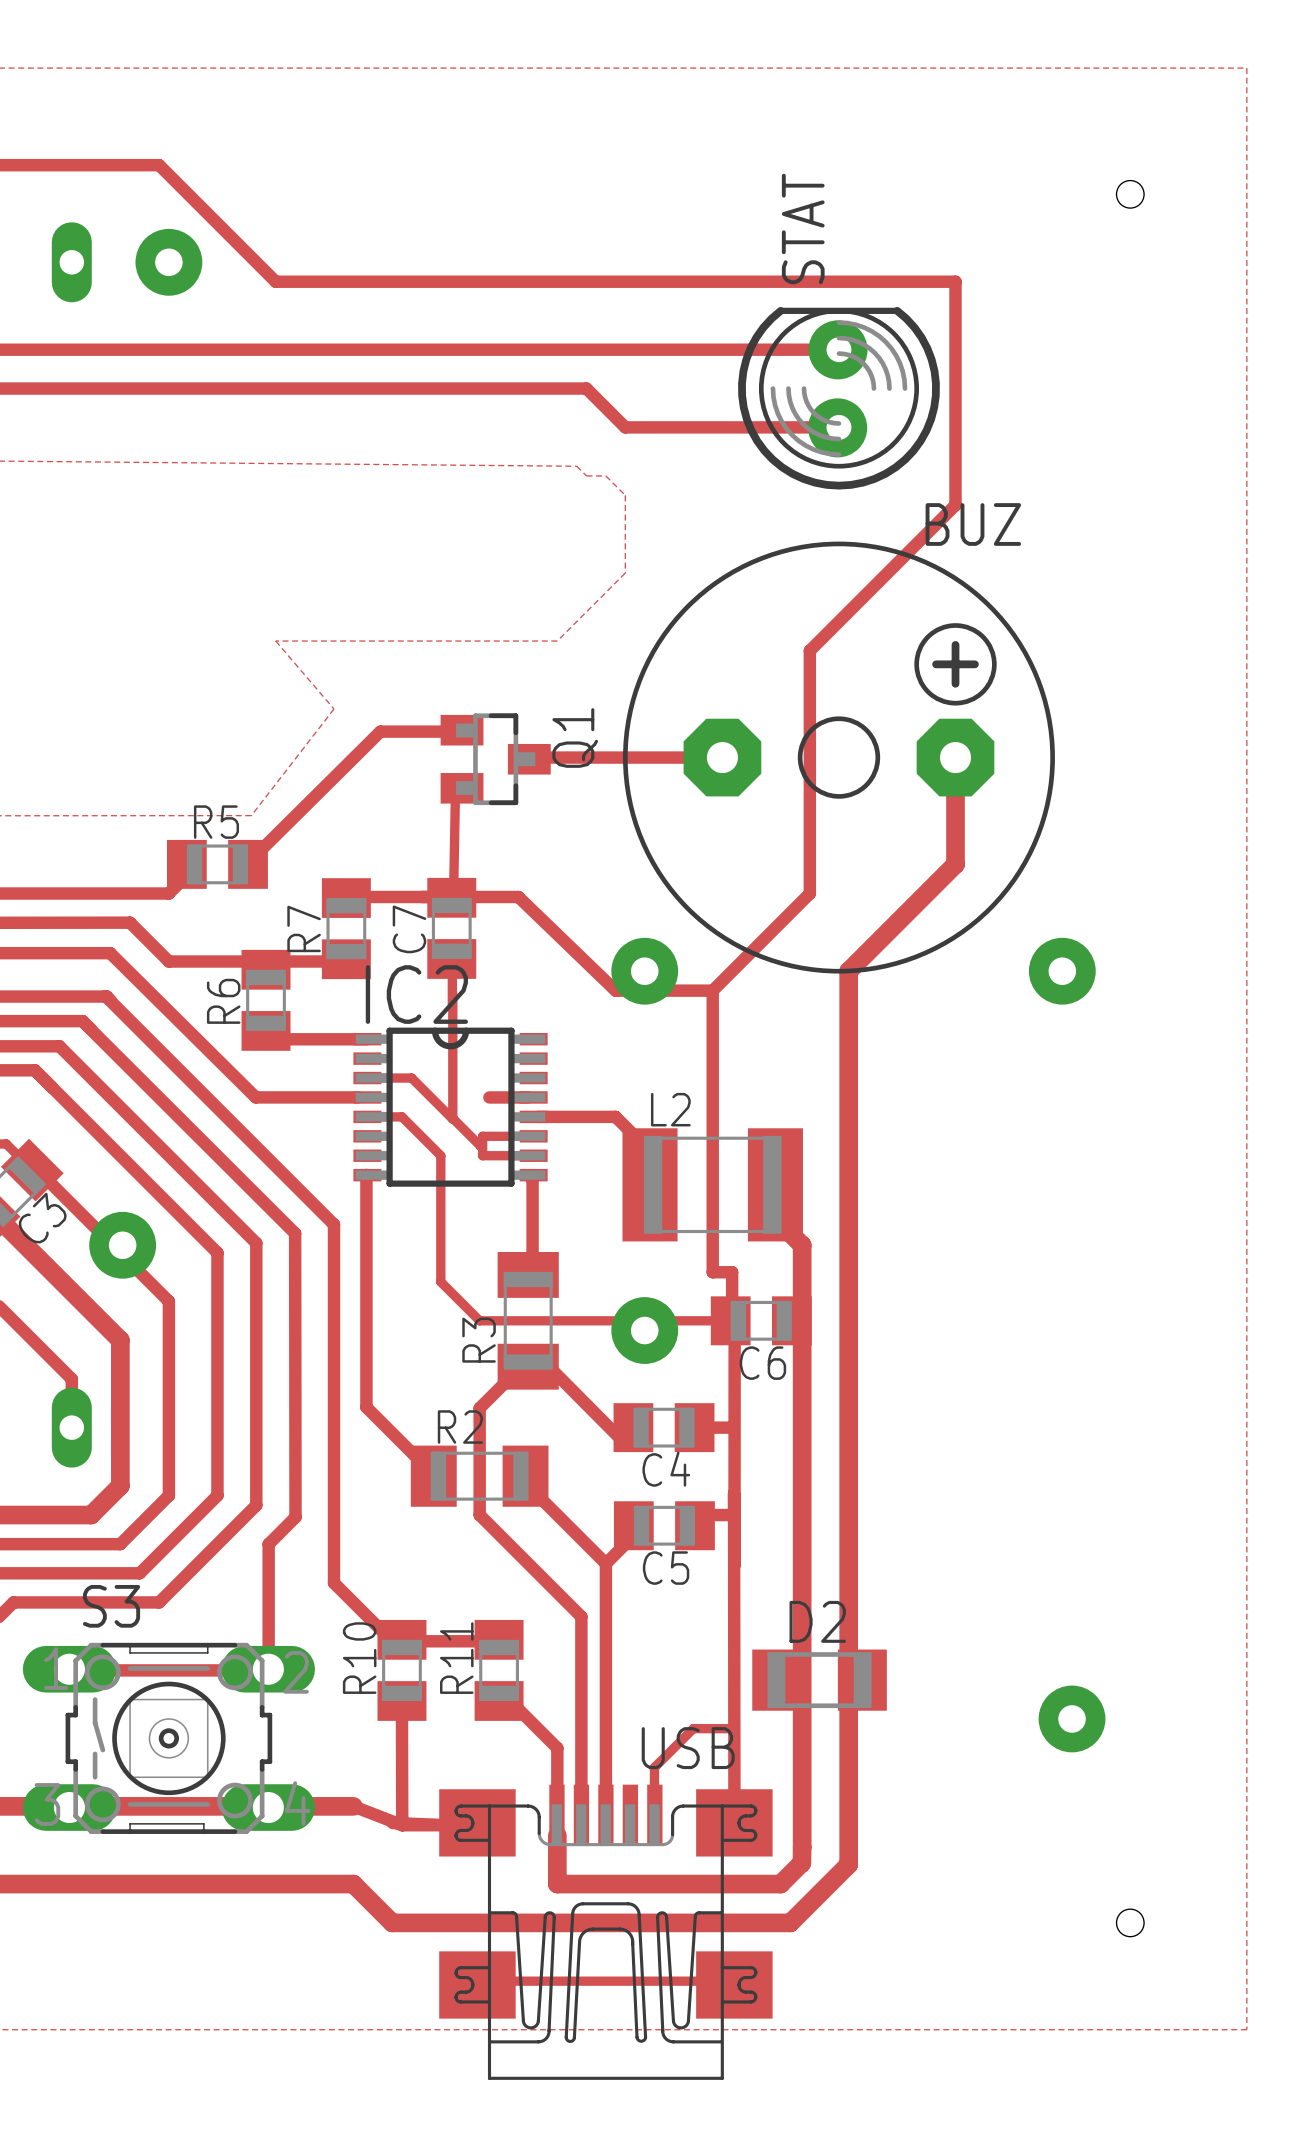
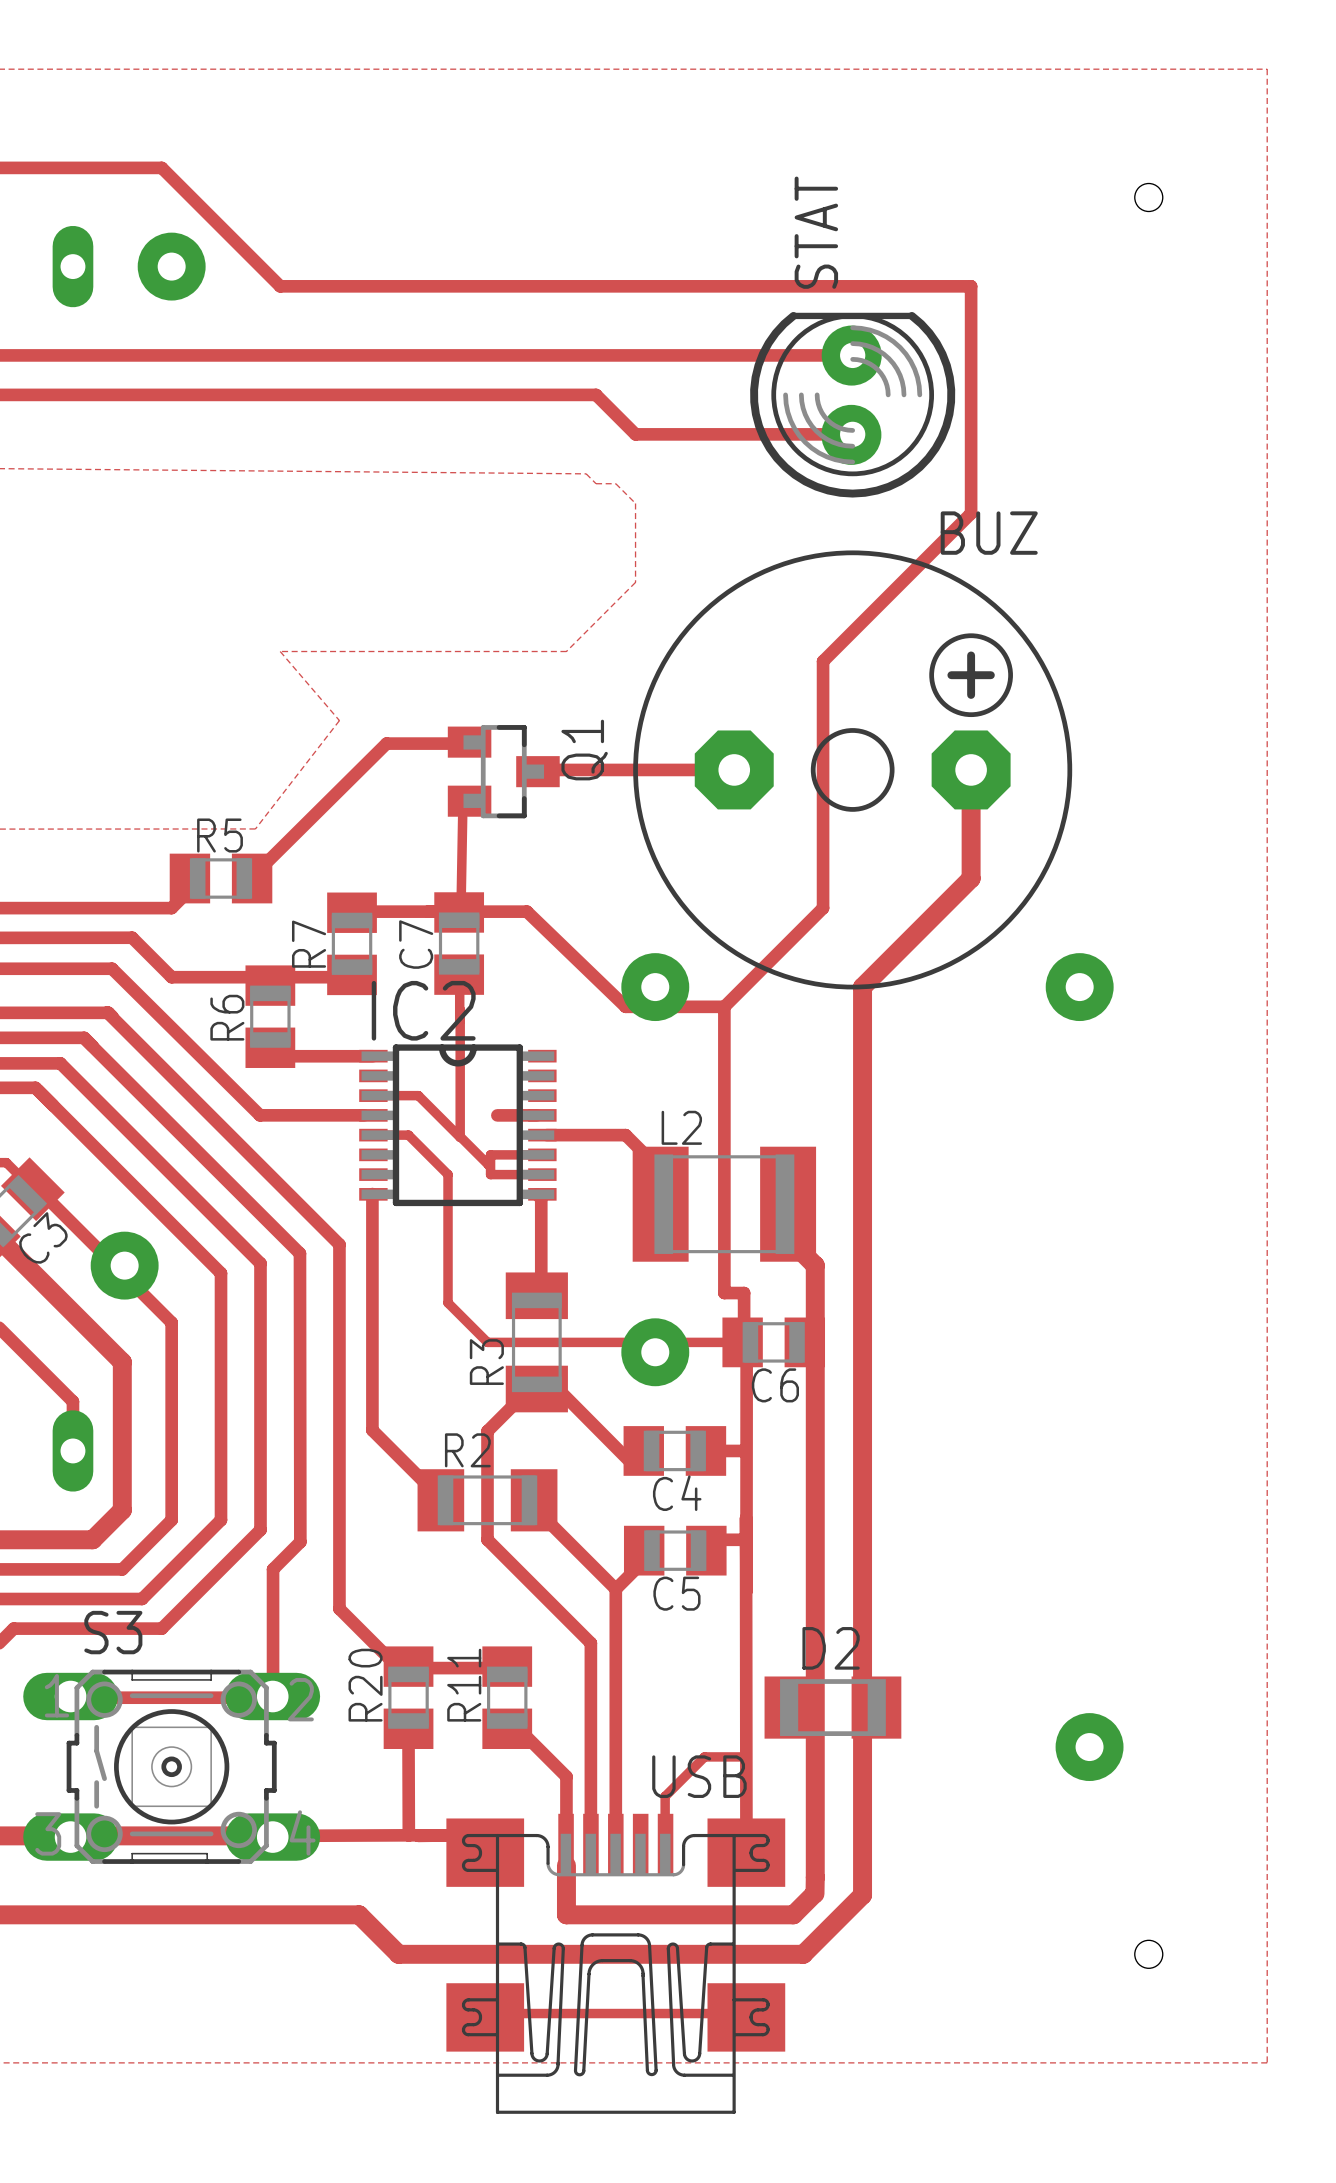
R10 name: R10 (359, 1658) -> R20 (365, 1685)
top track: (401, 1718) (402, 1825) -> (408, 1747) (408, 1835)
top track: none -> (408, 1835) (456, 1835) (418, 1835)
top track: (275, 1806) (353, 1806) (402, 1825) -> (280, 1835) (408, 1835)
top track: (392, 1823) (449, 1825) (402, 1825) -> none

